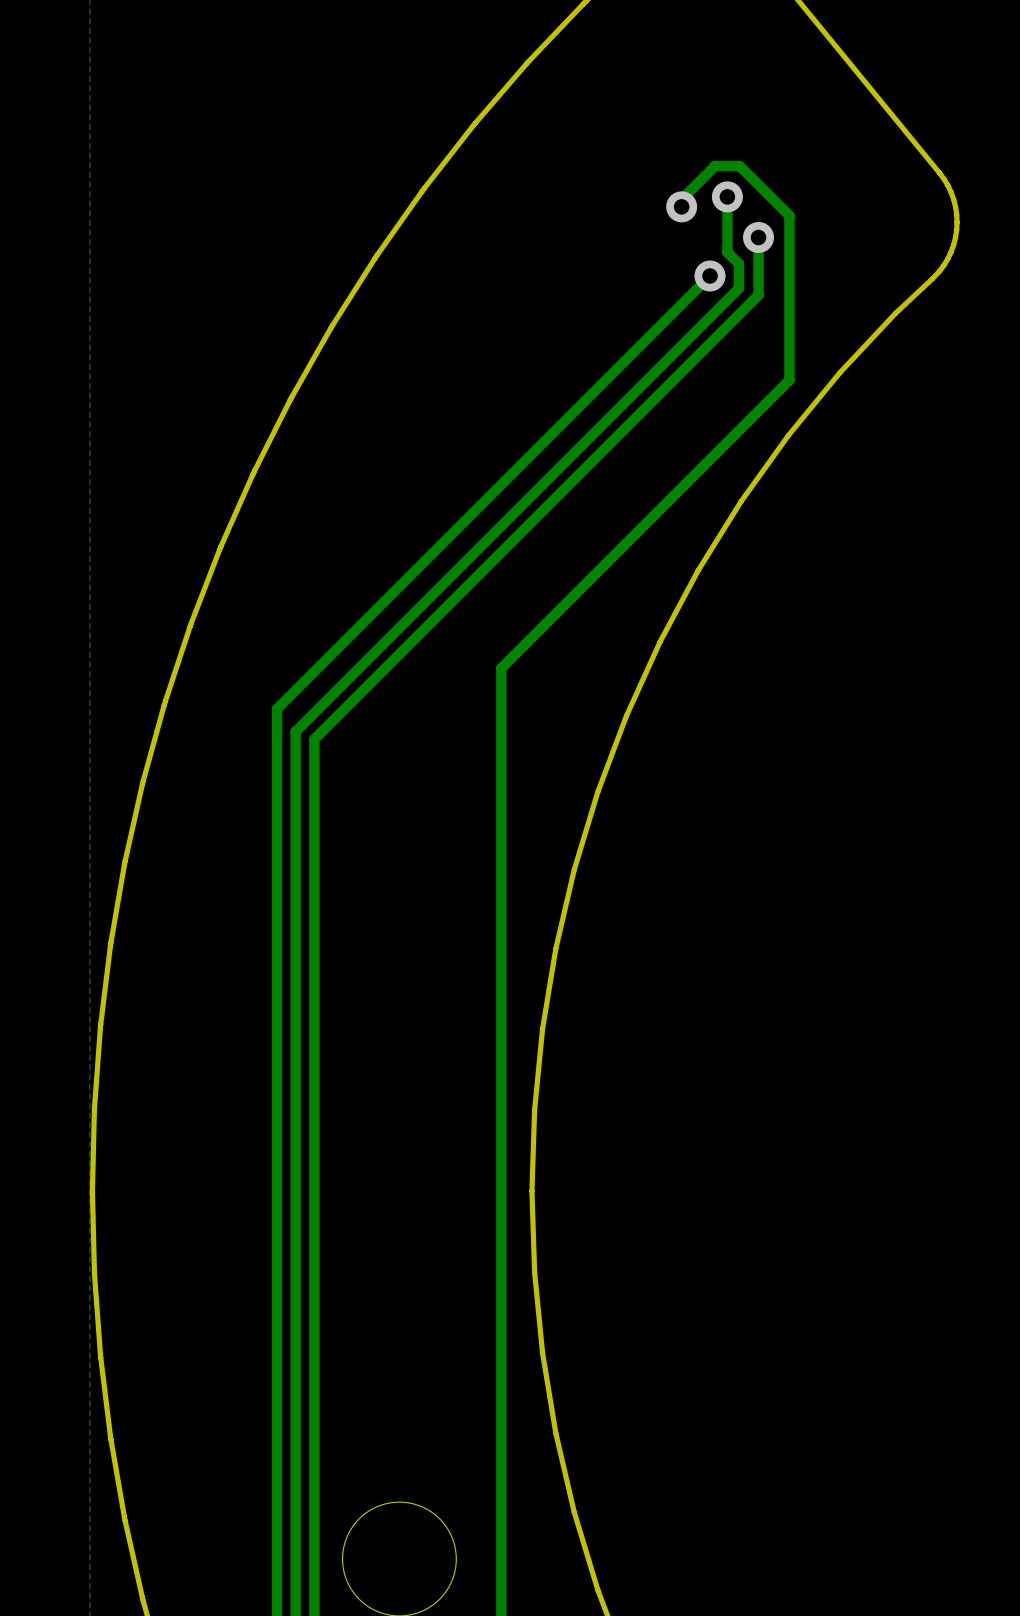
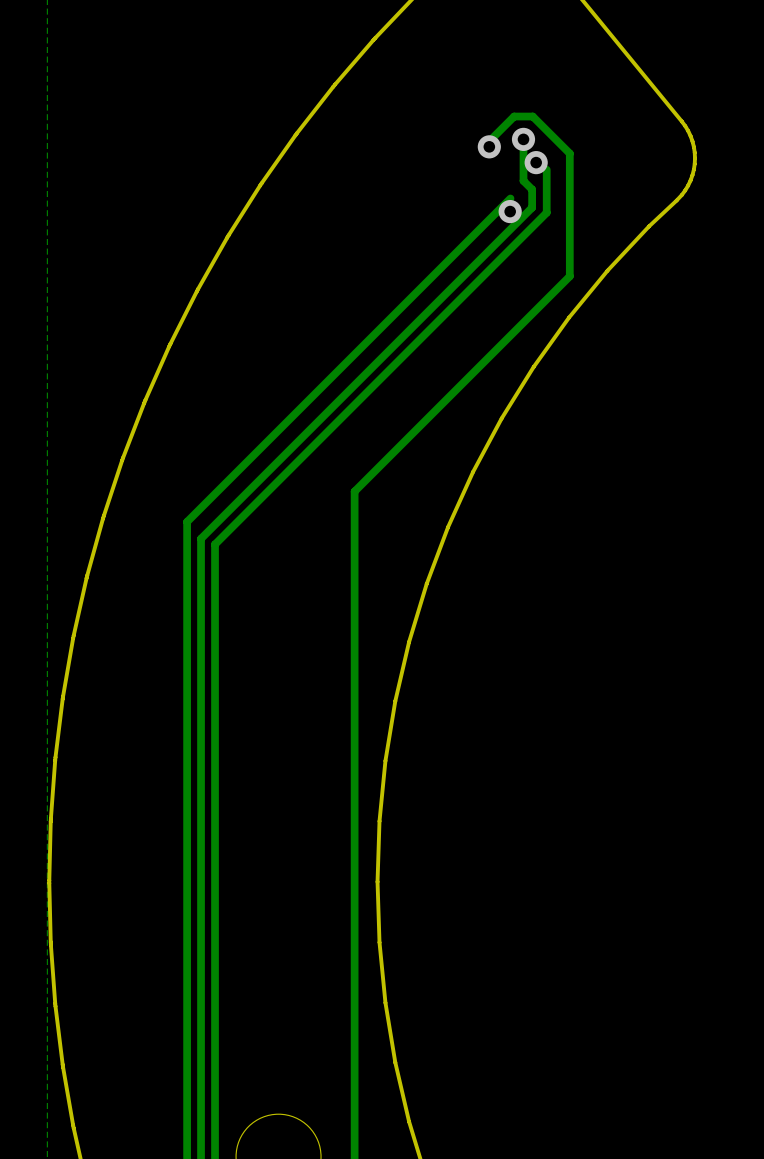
via position: (758, 237) -> (536, 162)
via position: (710, 276) -> (510, 211)

